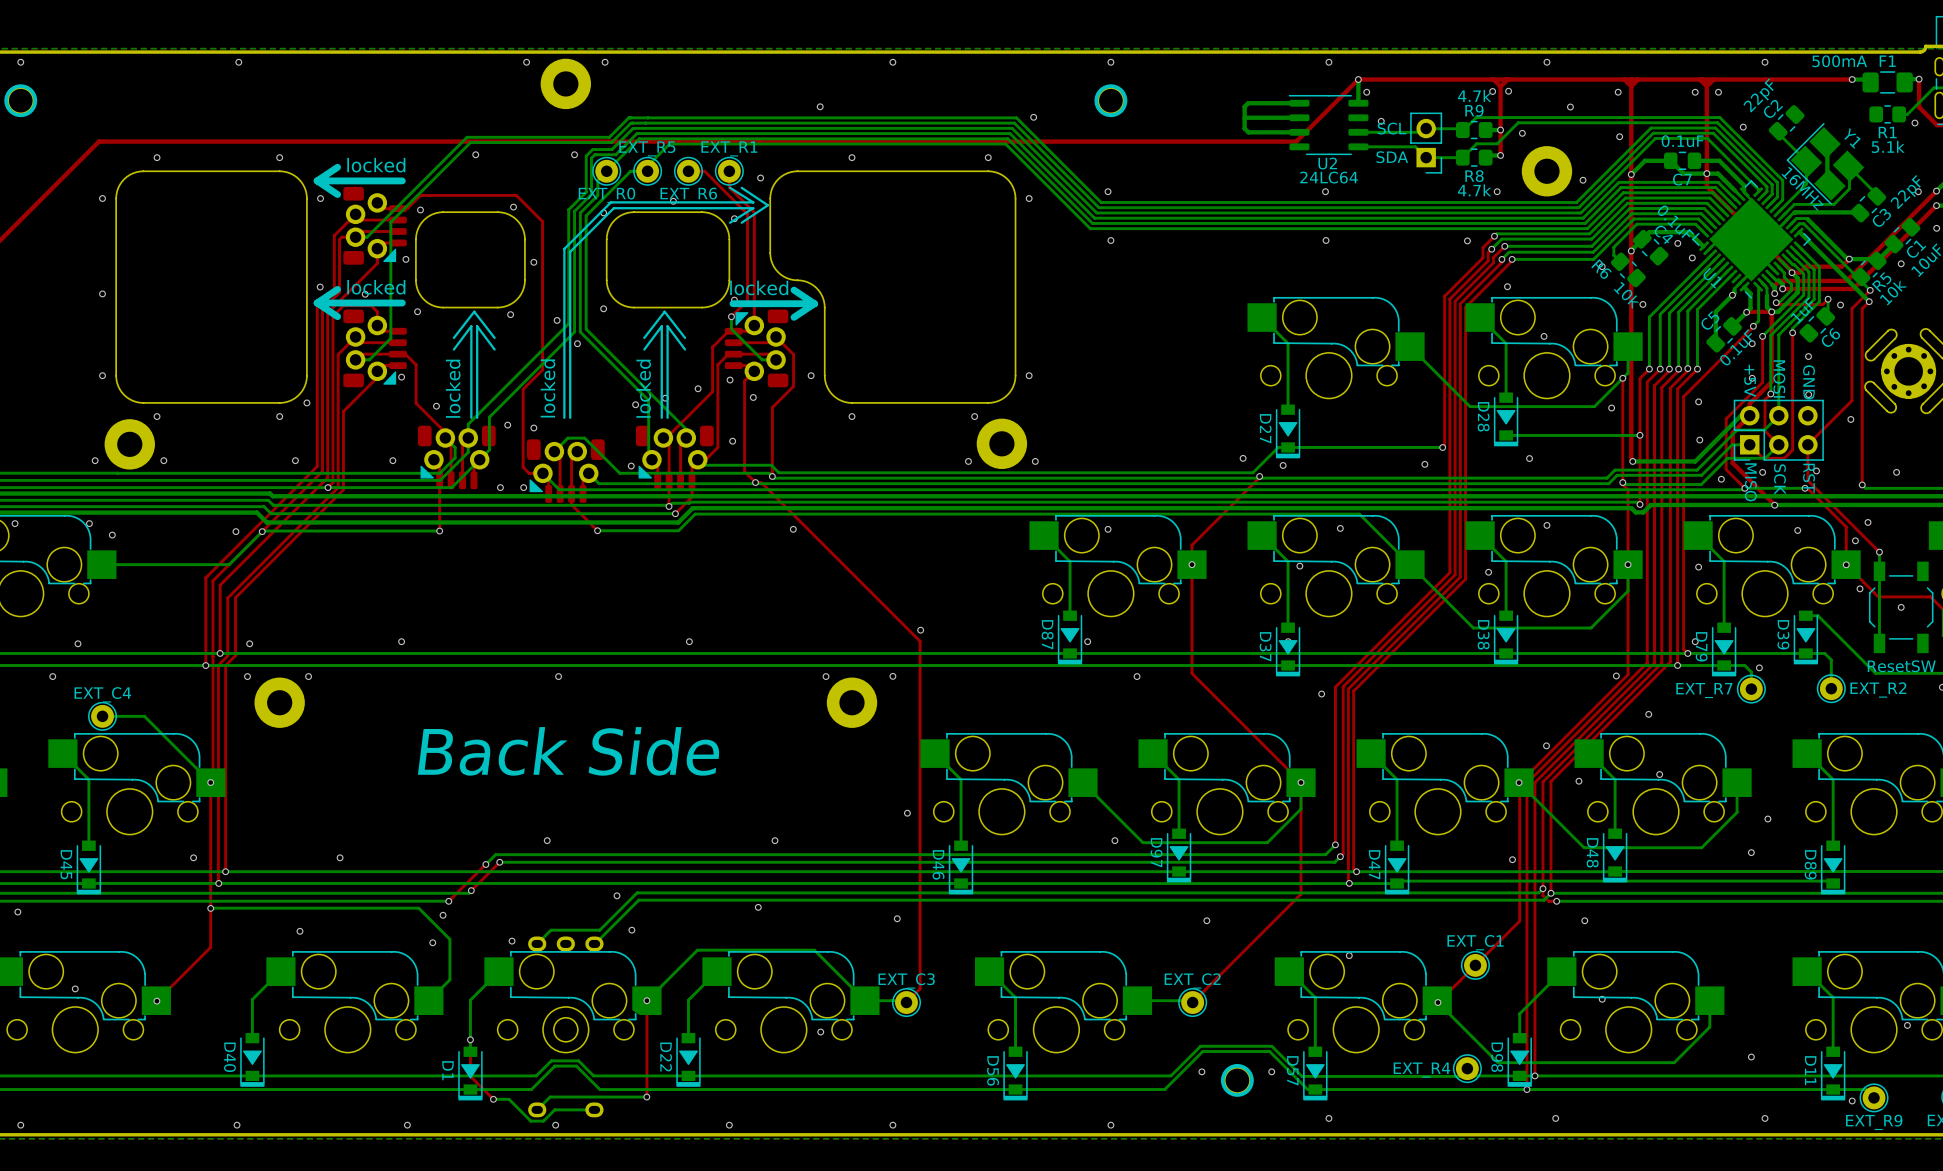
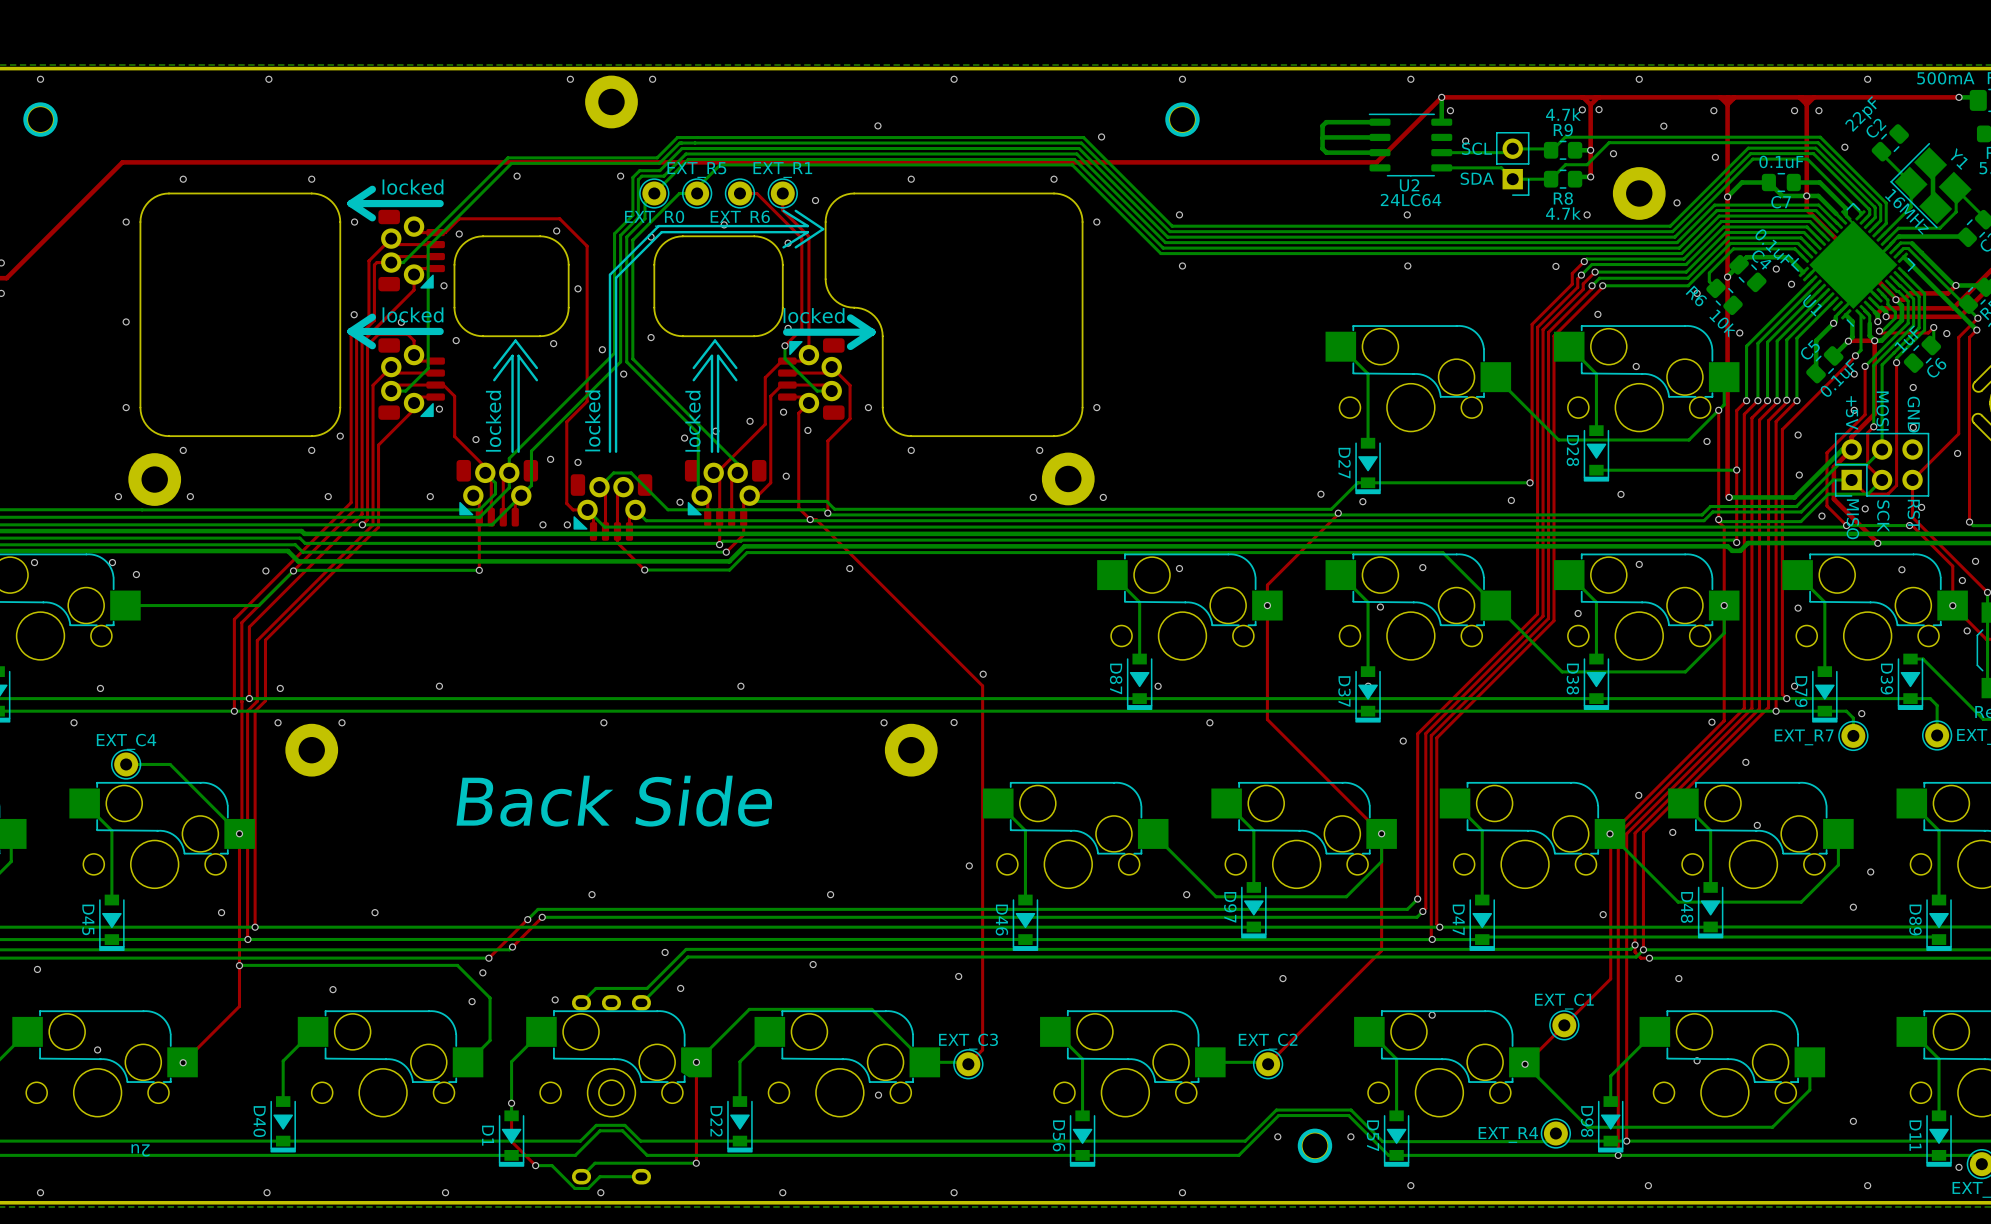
text: none -> 2u (140, 1150)

